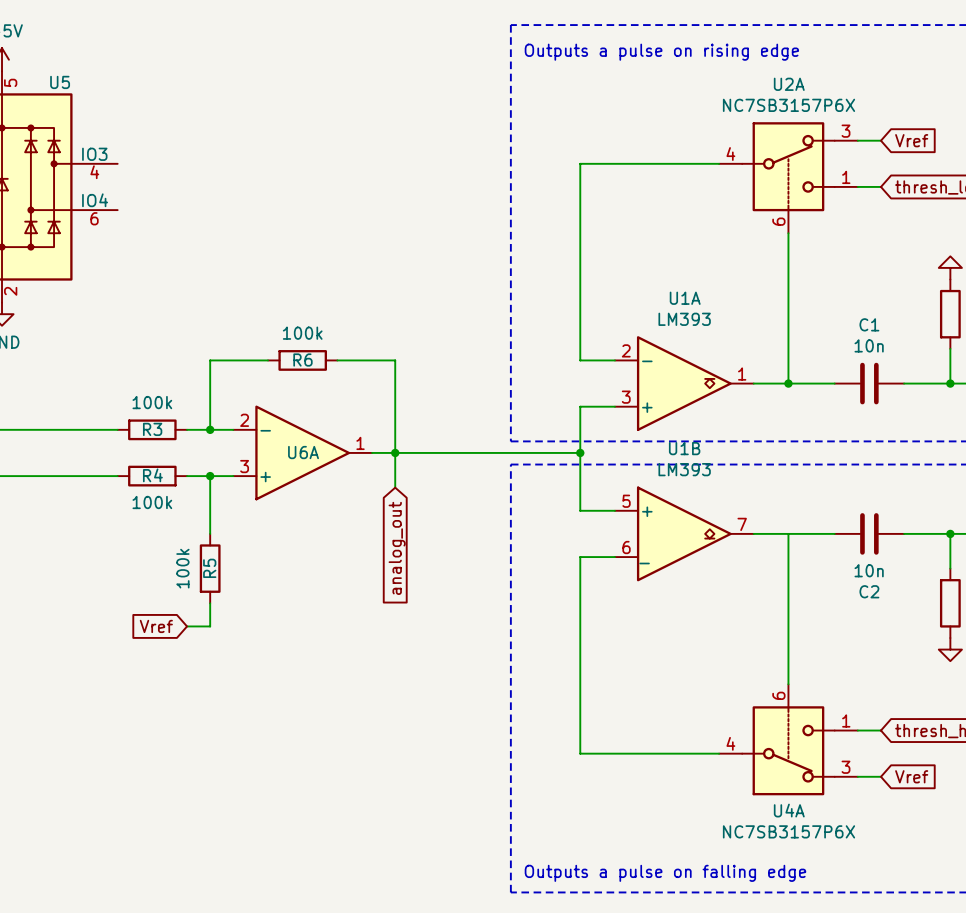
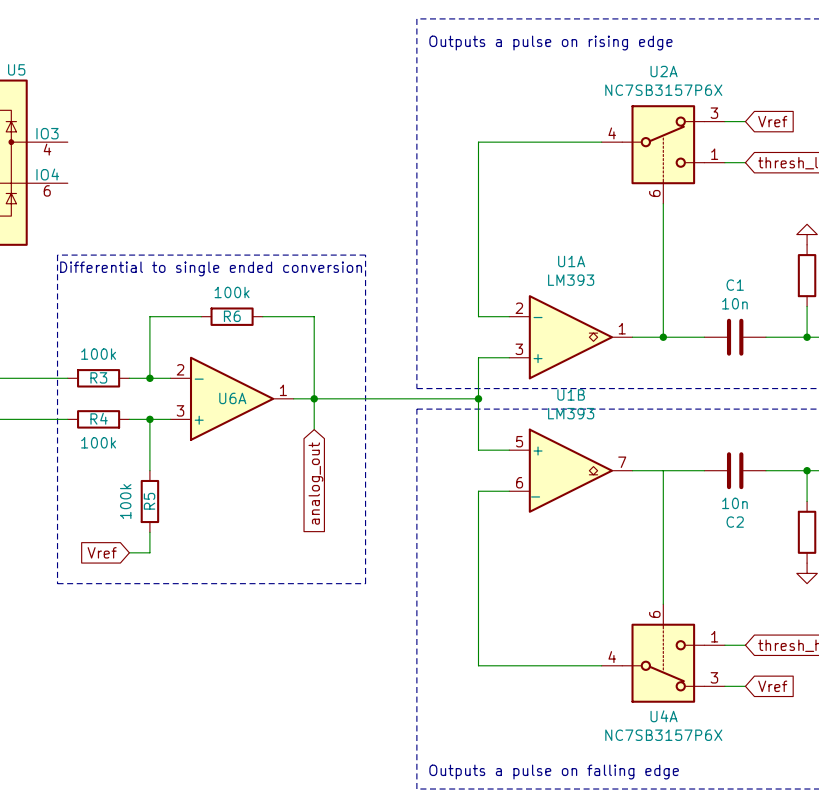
line: none -> (57, 255) (365, 255) (365, 583) (57, 583) (57, 255)
text: none -> Differential to single ended conversion (211, 268)

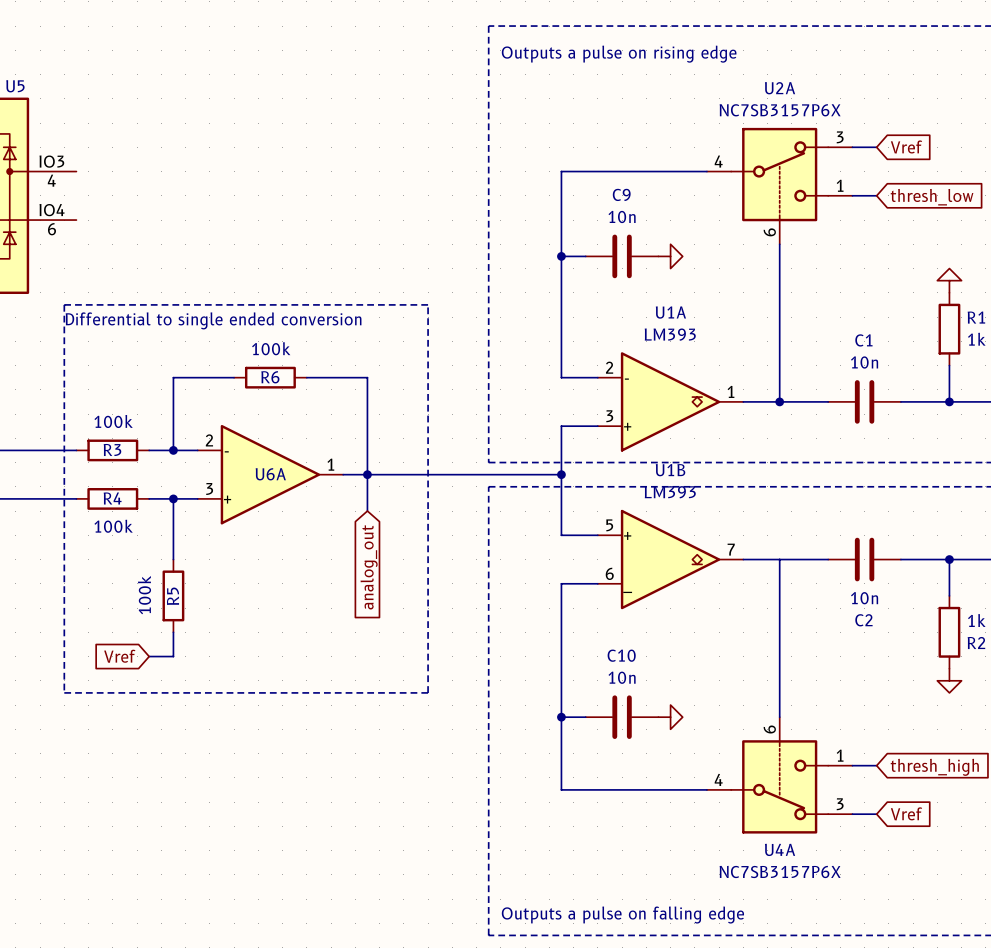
wire: none -> (561, 256) (585, 256)
junction: none -> (561, 256)
C9: none -> 10n (622, 256)
power symbol: none -> (670, 256)
wire: none -> (561, 717) (585, 717)
junction: none -> (561, 717)
C10: none -> 10n (622, 717)
power symbol: none -> (670, 717)

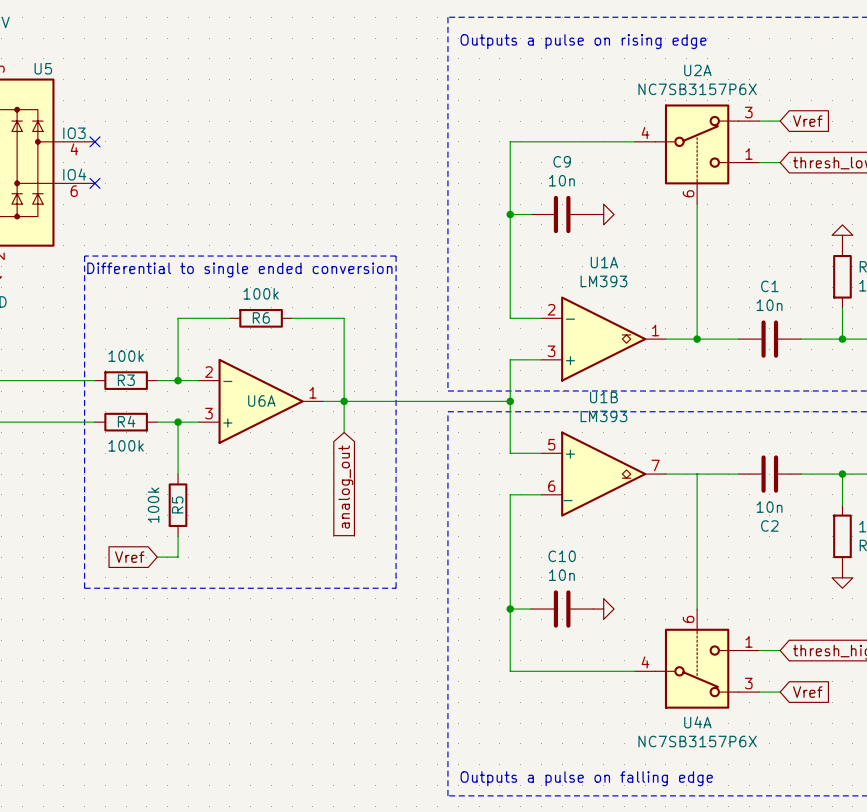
no-connect mark: none -> (94, 141)
no-connect mark: none -> (94, 183)

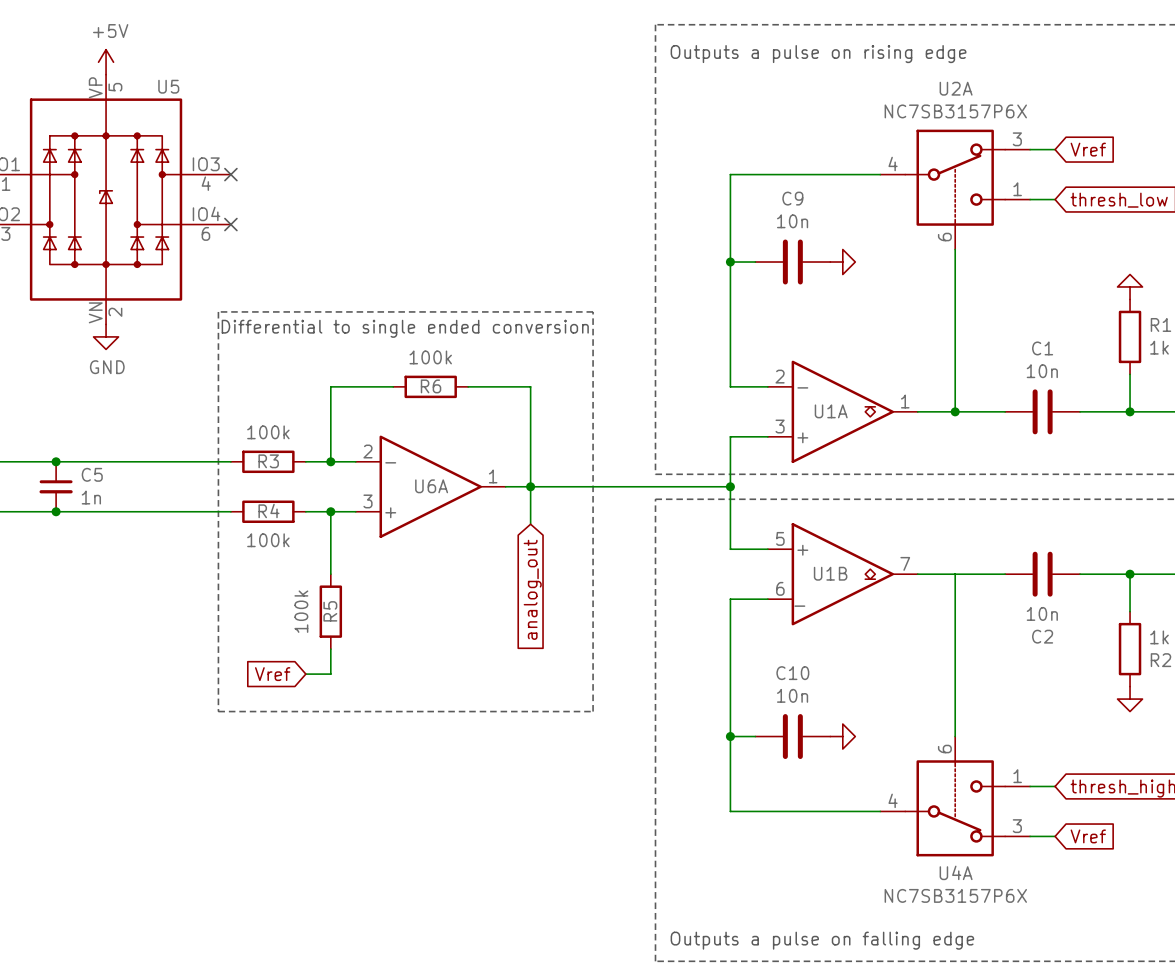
U1A name position: U1A (604, 262) -> U1A (831, 411)
U1A value: LM393 (603, 281) -> none
U1B name position: U1B (603, 397) -> U1B (830, 573)
U1B value: LM393 (603, 416) -> none

